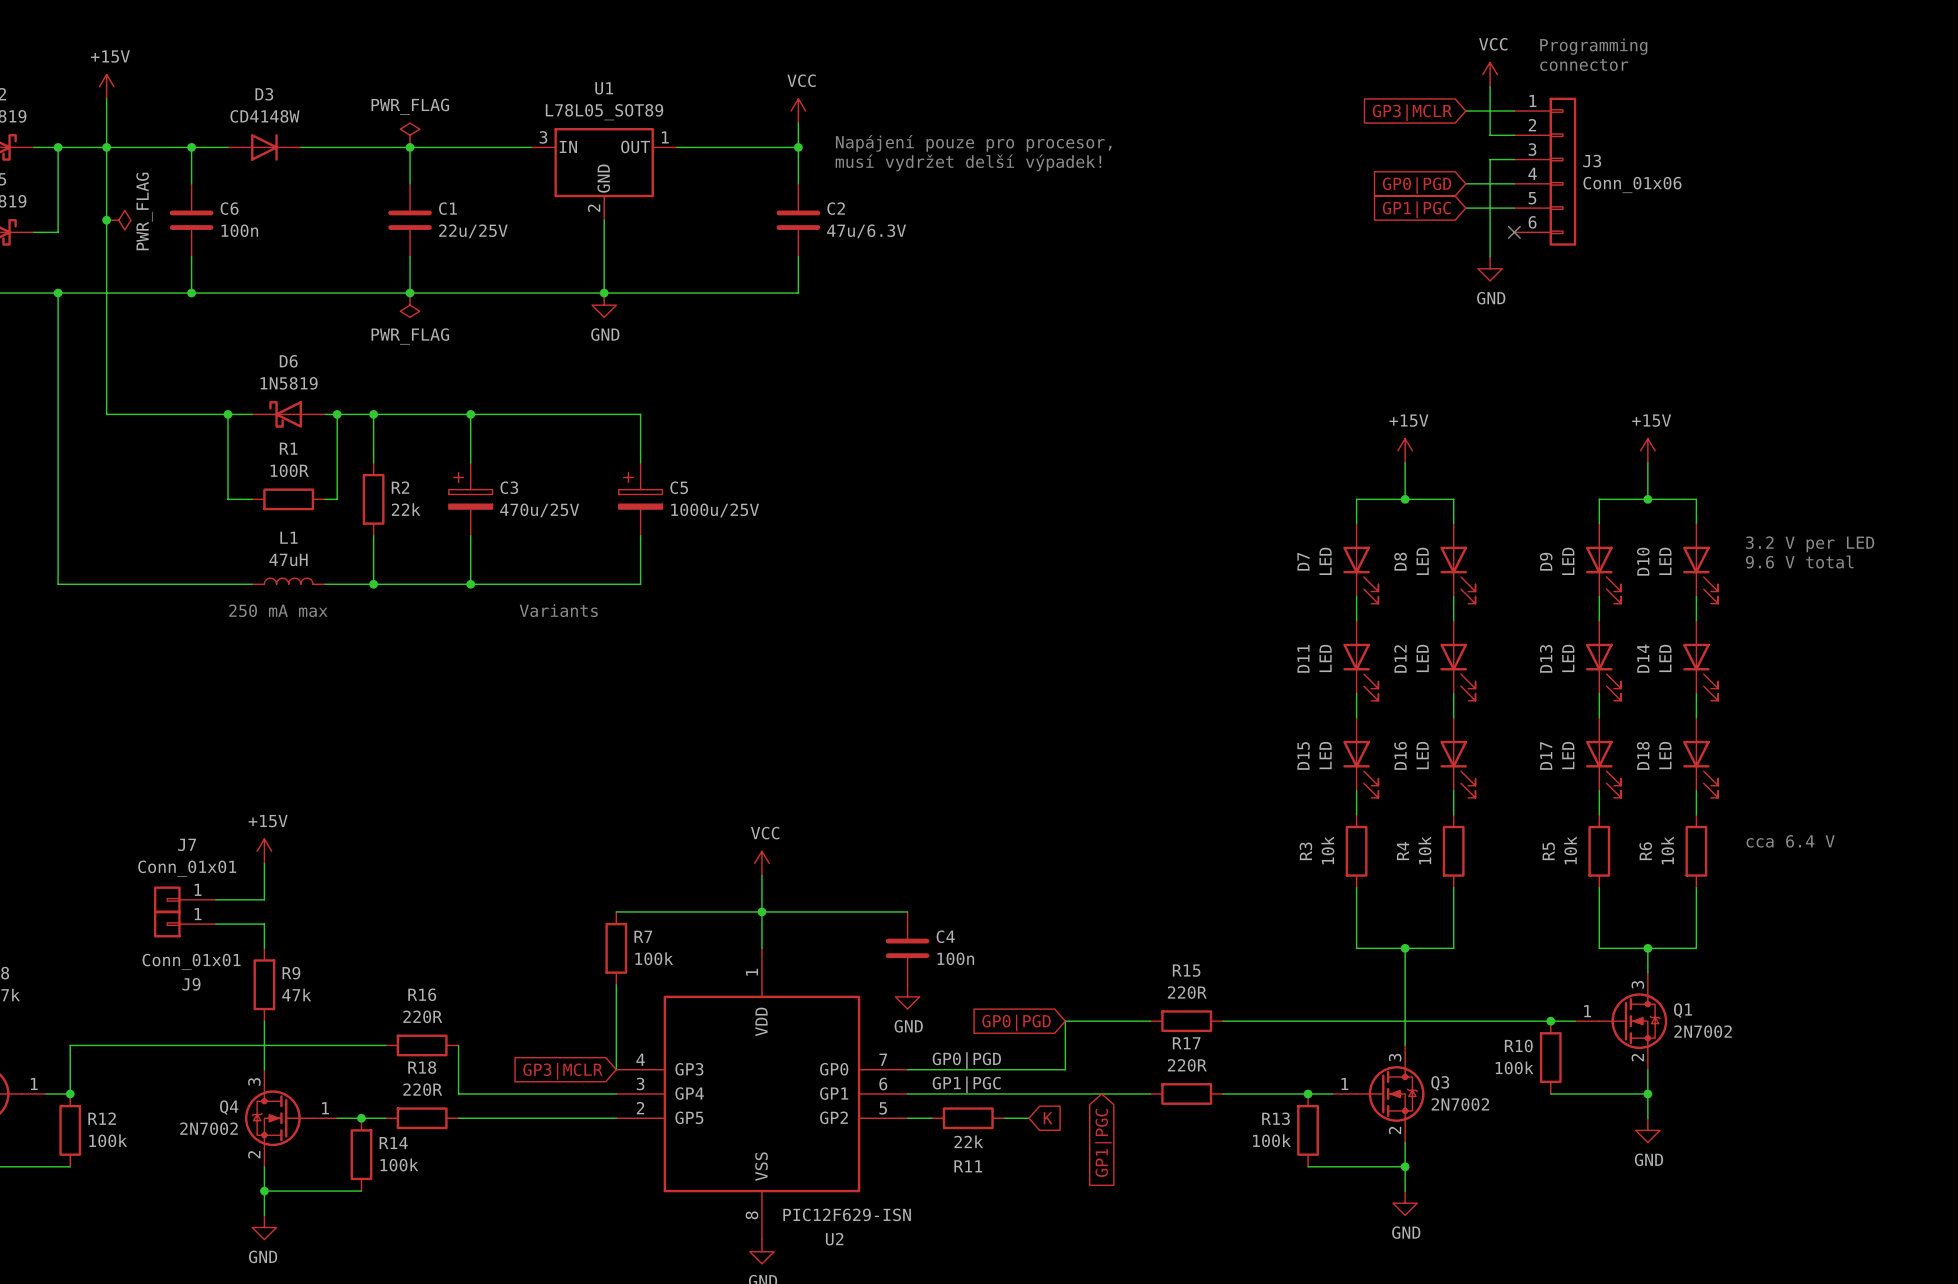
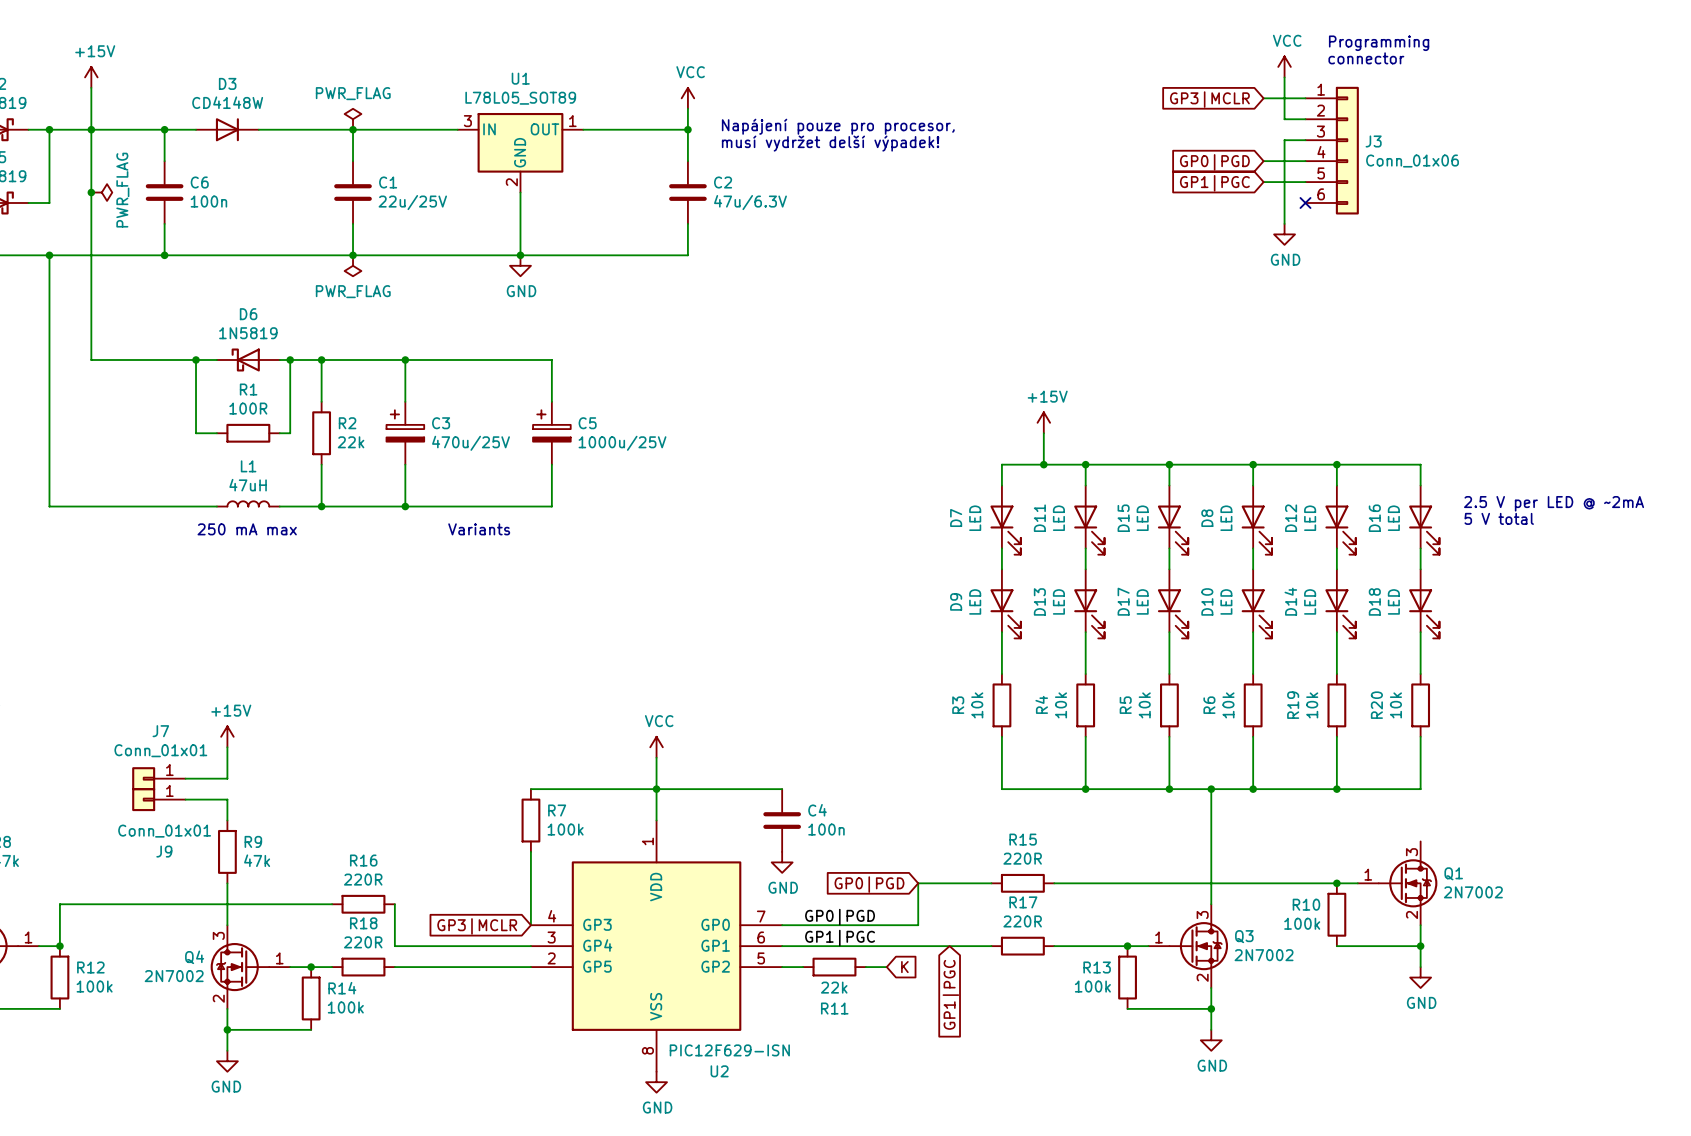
power symbol position: +15V (1405, 450) -> +15V (1043, 422)
power symbol: +15V (1647, 450) -> none
wire: (1405, 462) (1405, 499) -> (1043, 433) (1043, 464)
wire: (1647, 462) (1647, 499) -> none
junction: (1405, 499) -> none
junction: (1647, 499) -> none
wire: (1356, 523) (1356, 499) (1453, 499) (1453, 523) -> none
wire: (1599, 523) (1599, 499) (1696, 499) (1696, 523) -> none
junction: none -> (1043, 464)
wire: none -> (1085, 464) (1085, 485)
junction: none -> (1085, 464)
junction: none -> (1169, 464)
junction: none -> (1253, 464)
junction: none -> (1336, 464)
text: 3.2 V per LED (1810, 544) -> none
wire: none -> (1001, 485) (1001, 464) (1420, 464) (1420, 485)
text: 9.6 V total (1799, 562) -> none
D7 position: (1360, 563) -> (1005, 520)
D8 position: (1457, 563) -> (1256, 520)
D9 position: (1603, 563) -> (1005, 603)
D10 position: (1700, 563) -> (1256, 603)
text: none -> 2.5 V per LED @ ~2mA (1554, 503)
wire: (1599, 596) (1599, 620) -> none
wire: (1696, 596) (1696, 620) -> (1336, 464) (1336, 485)
text: none -> 5 V total (1499, 518)
wire: none -> (1001, 548) (1001, 569)
D11 position: (1360, 660) -> (1089, 520)
D12 position: (1457, 660) -> (1340, 520)
D13 position: (1603, 660) -> (1089, 603)
D14 position: (1700, 660) -> (1340, 603)
wire: (1599, 693) (1599, 717) -> none
wire: (1696, 693) (1696, 717) -> (1336, 548) (1336, 569)
wire: none -> (1001, 632) (1001, 674)
wire: none -> (1085, 632) (1085, 674)
wire: none -> (1336, 632) (1336, 674)
wire: none -> (1420, 632) (1420, 674)
D15 position: (1360, 757) -> (1173, 520)
D16 position: (1457, 757) -> (1424, 520)
D17 position: (1603, 757) -> (1173, 603)
D18 position: (1700, 757) -> (1424, 603)
wire: (1356, 790) (1356, 814) -> (1085, 548) (1085, 569)
wire: (1453, 790) (1453, 814) -> none
wire: (1599, 790) (1599, 814) -> none
wire: (1696, 790) (1696, 814) -> (1420, 548) (1420, 569)
R19: none -> 10k (1336, 705)
R20: none -> 10k (1420, 705)
text: cca 6.4 V (1790, 841) -> none
wire: none -> (1001, 736) (1001, 789) (1420, 789) (1420, 736)
wire: none -> (1085, 736) (1085, 789)
wire: none -> (1169, 736) (1169, 768)
R3 position: (1356, 851) -> (1001, 705)
wire: none -> (1253, 736) (1253, 768)
R4 position: (1453, 851) -> (1085, 705)
wire: none -> (1336, 736) (1336, 789)
R5 position: (1599, 851) -> (1169, 705)
R6 position: (1696, 851) -> (1253, 705)
wire: (1599, 887) (1599, 948) (1696, 948) (1696, 887) -> none
junction: none -> (1085, 789)
wire: (1356, 911) (1356, 948) (1453, 948) (1453, 911) -> none
junction: none -> (1169, 789)
wire: none -> (1211, 789) (1211, 820)
junction: none -> (1211, 789)
junction: none -> (1253, 789)
junction: none -> (1336, 789)
junction: (1405, 948) -> none
wire: (1647, 948) (1647, 972) -> none
junction: (1647, 948) -> none

